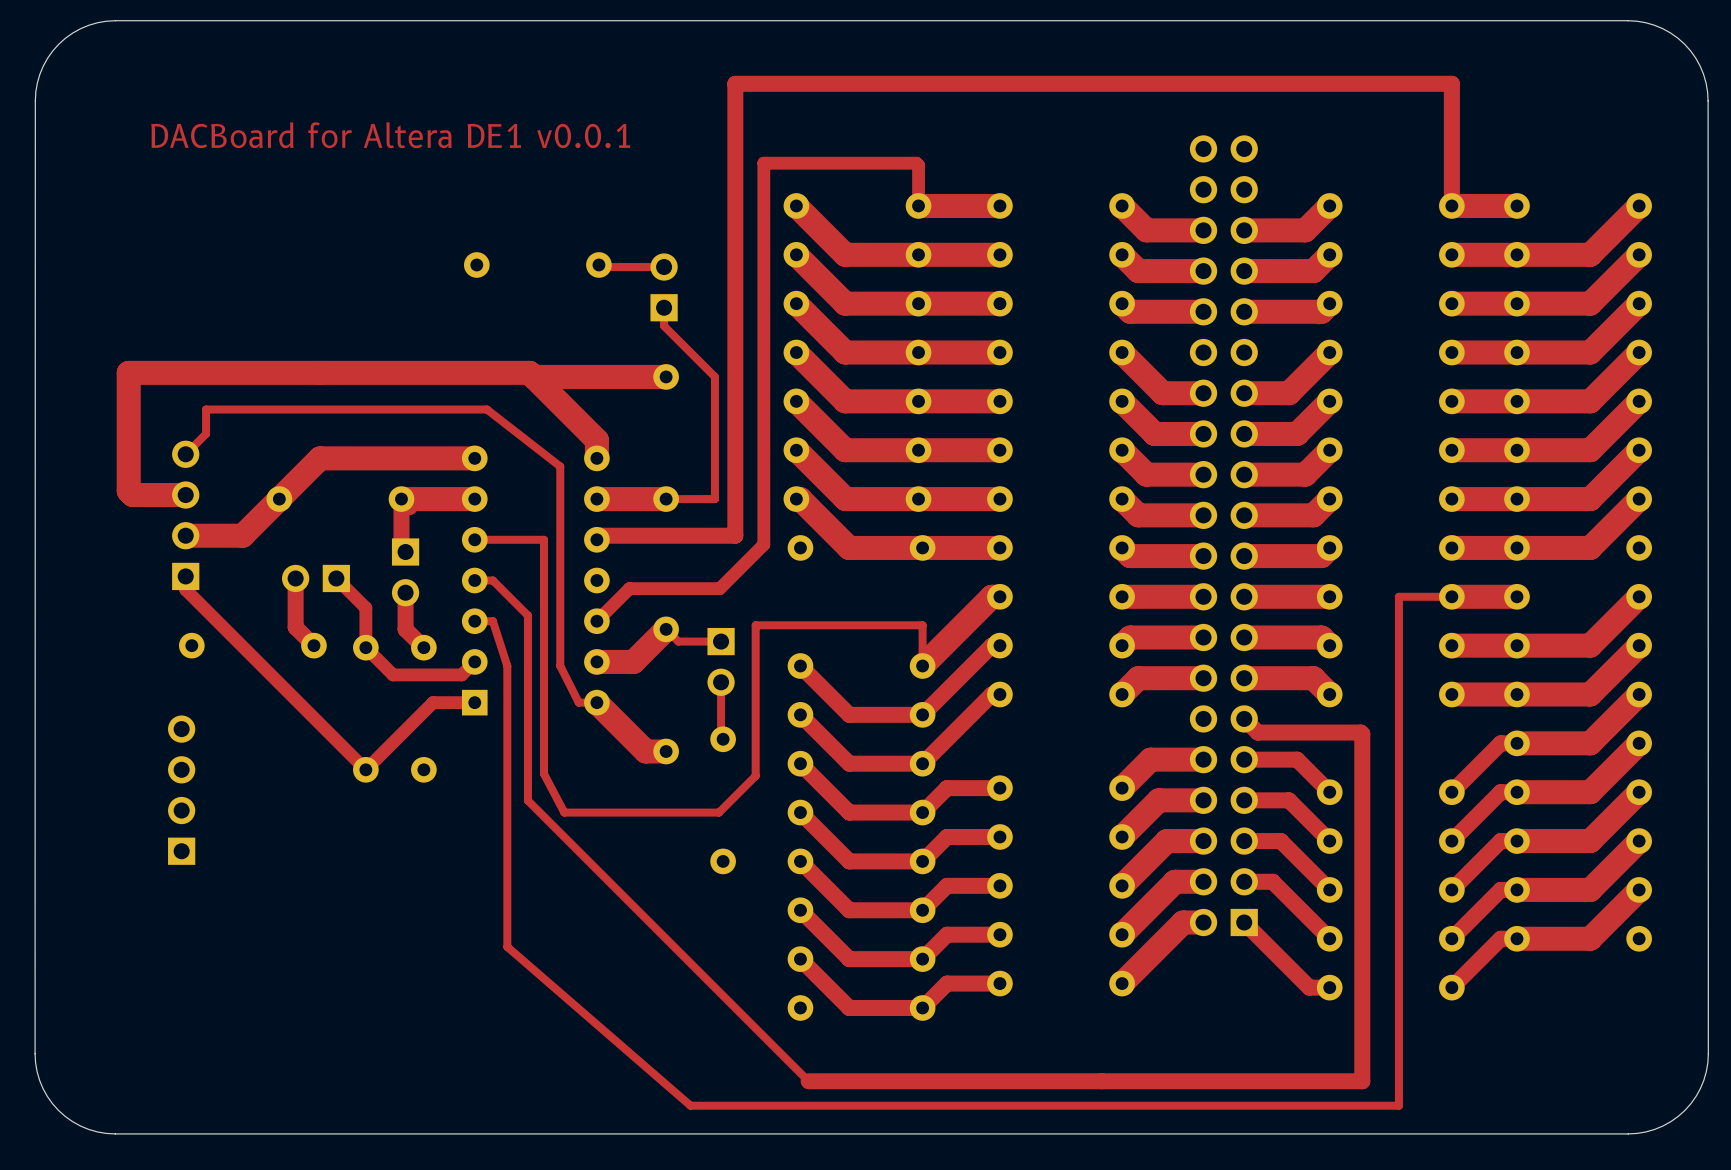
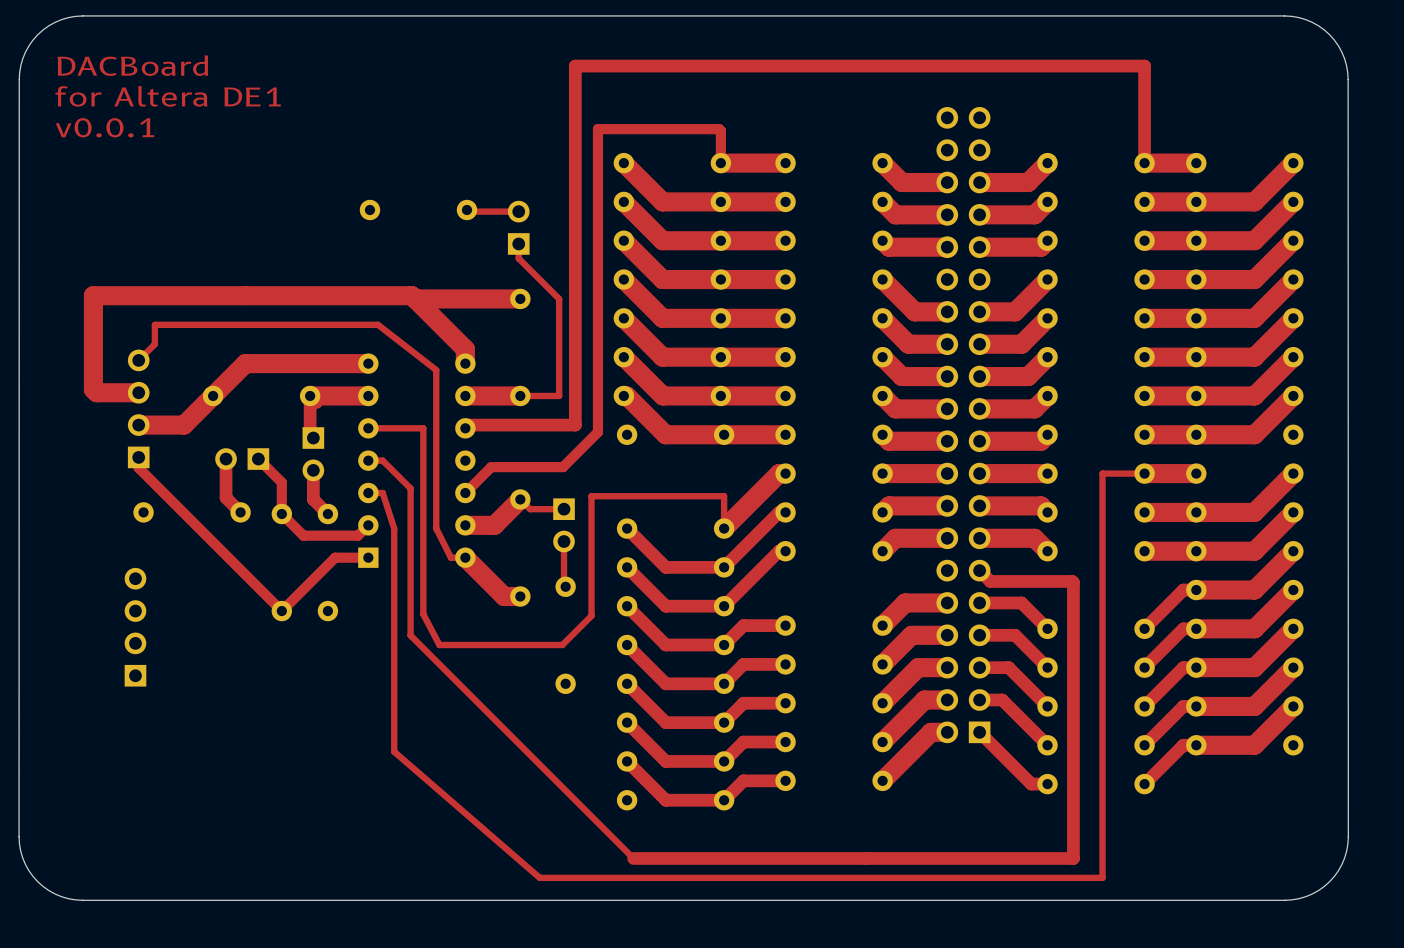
text: none -> DACBoard (132, 65)
text: DACBoard for Altera DE1 v0.0.1 (390, 135) -> for Altera DE1 (168, 96)
text: none -> v0.0.1 (105, 127)

